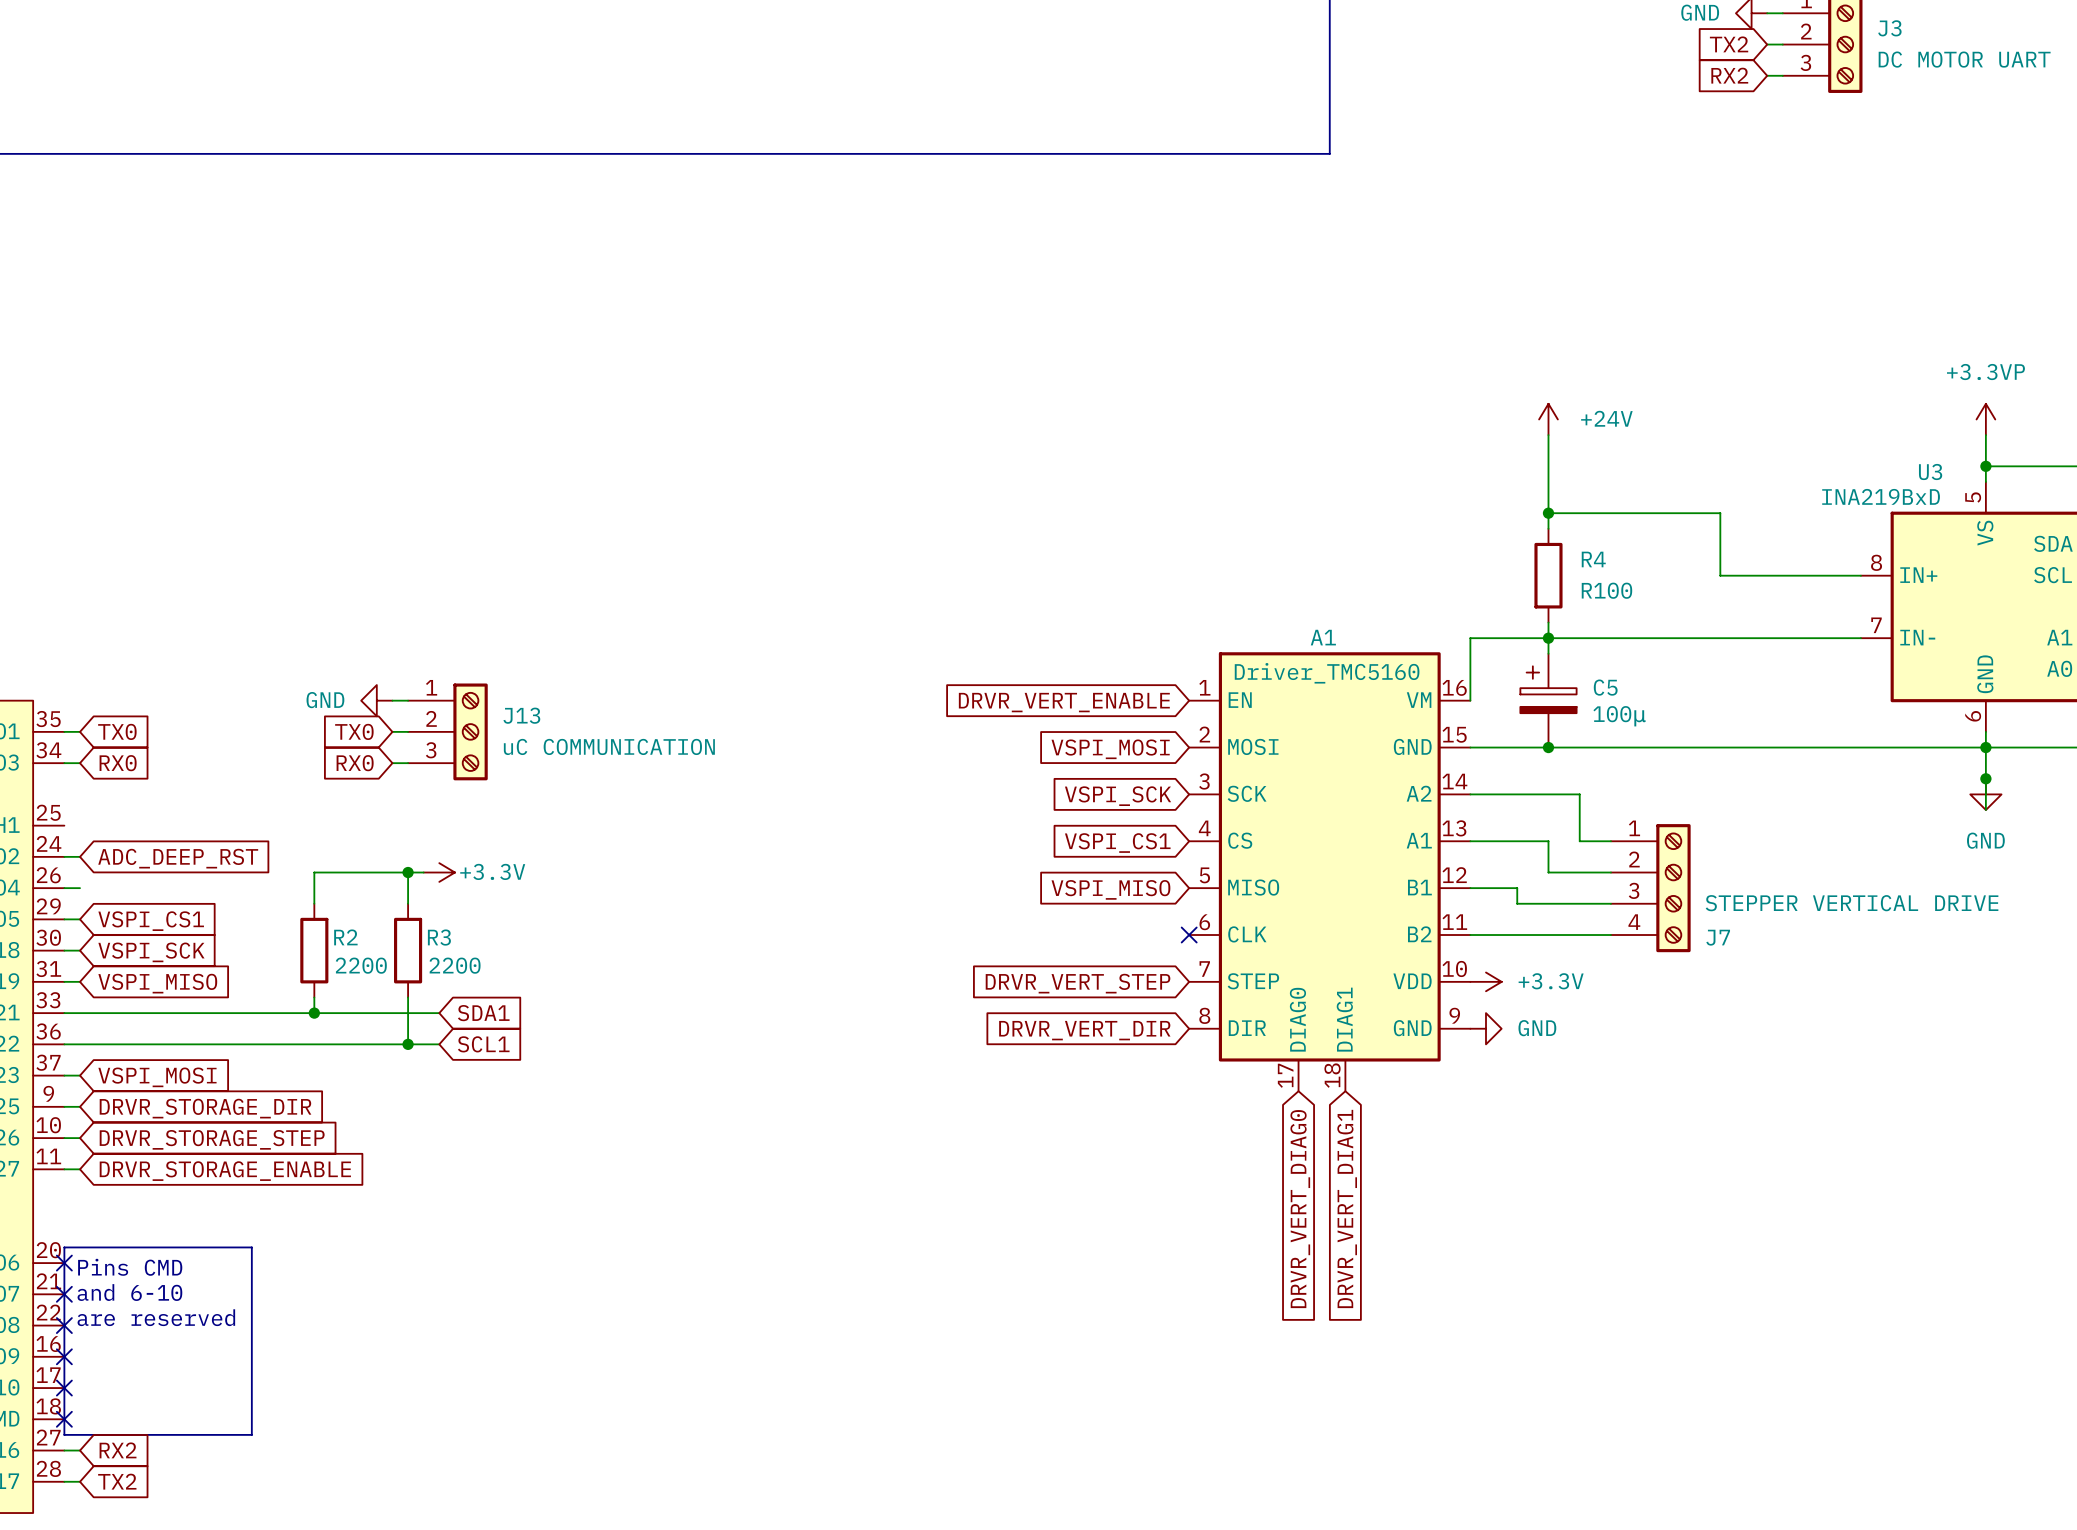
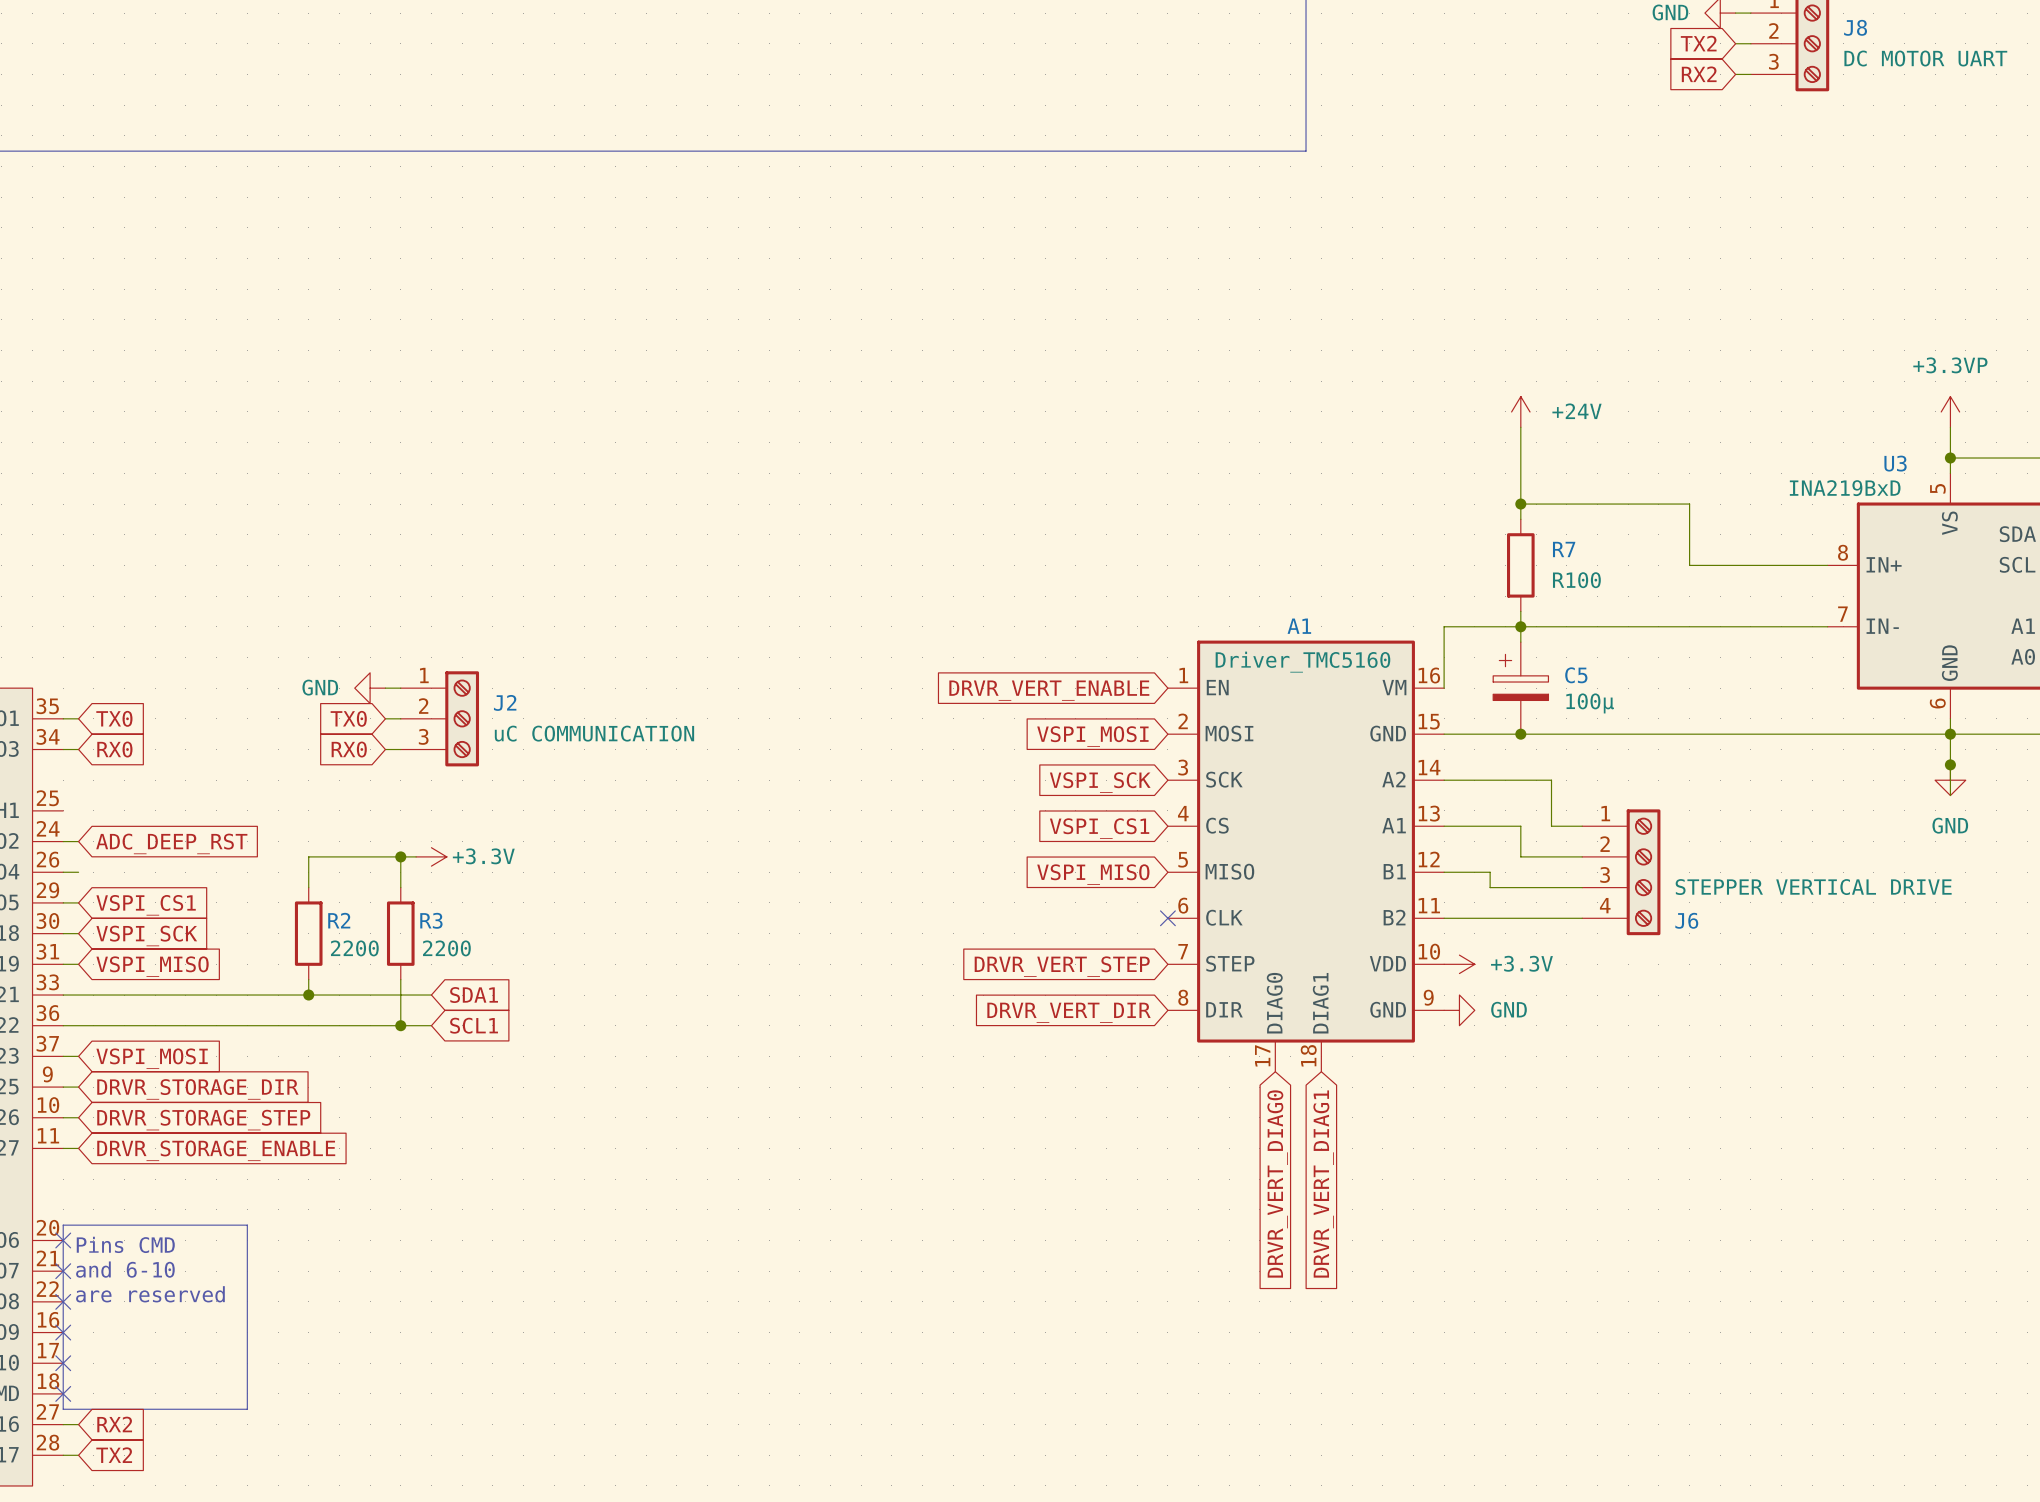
J3 name: J3 (1889, 28) -> J8 (1855, 27)
R4 name: R4 (1593, 559) -> R7 (1564, 549)
J13 name: J13 (521, 715) -> J2 (505, 702)
J7 name: J7 (1718, 937) -> J6 (1686, 920)

